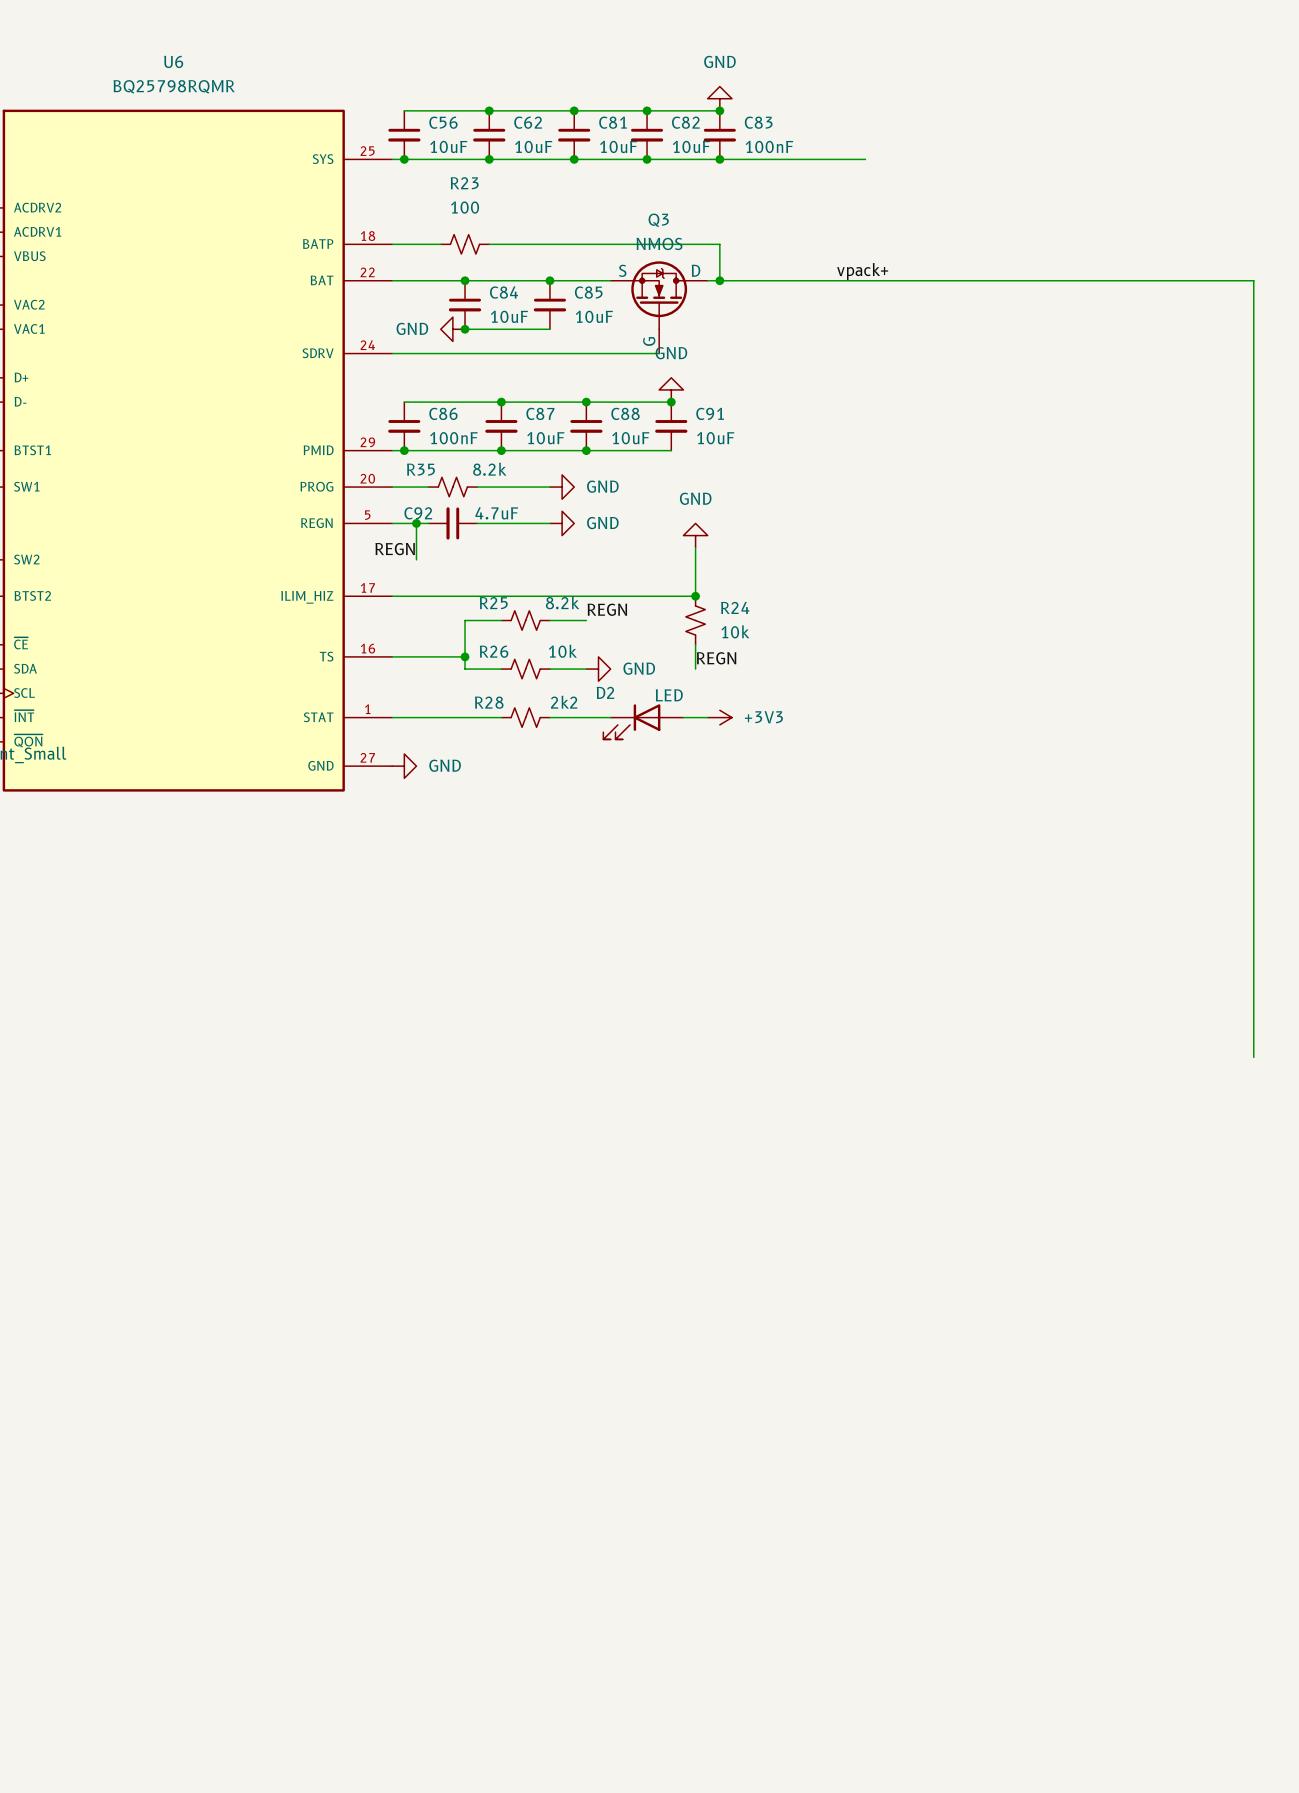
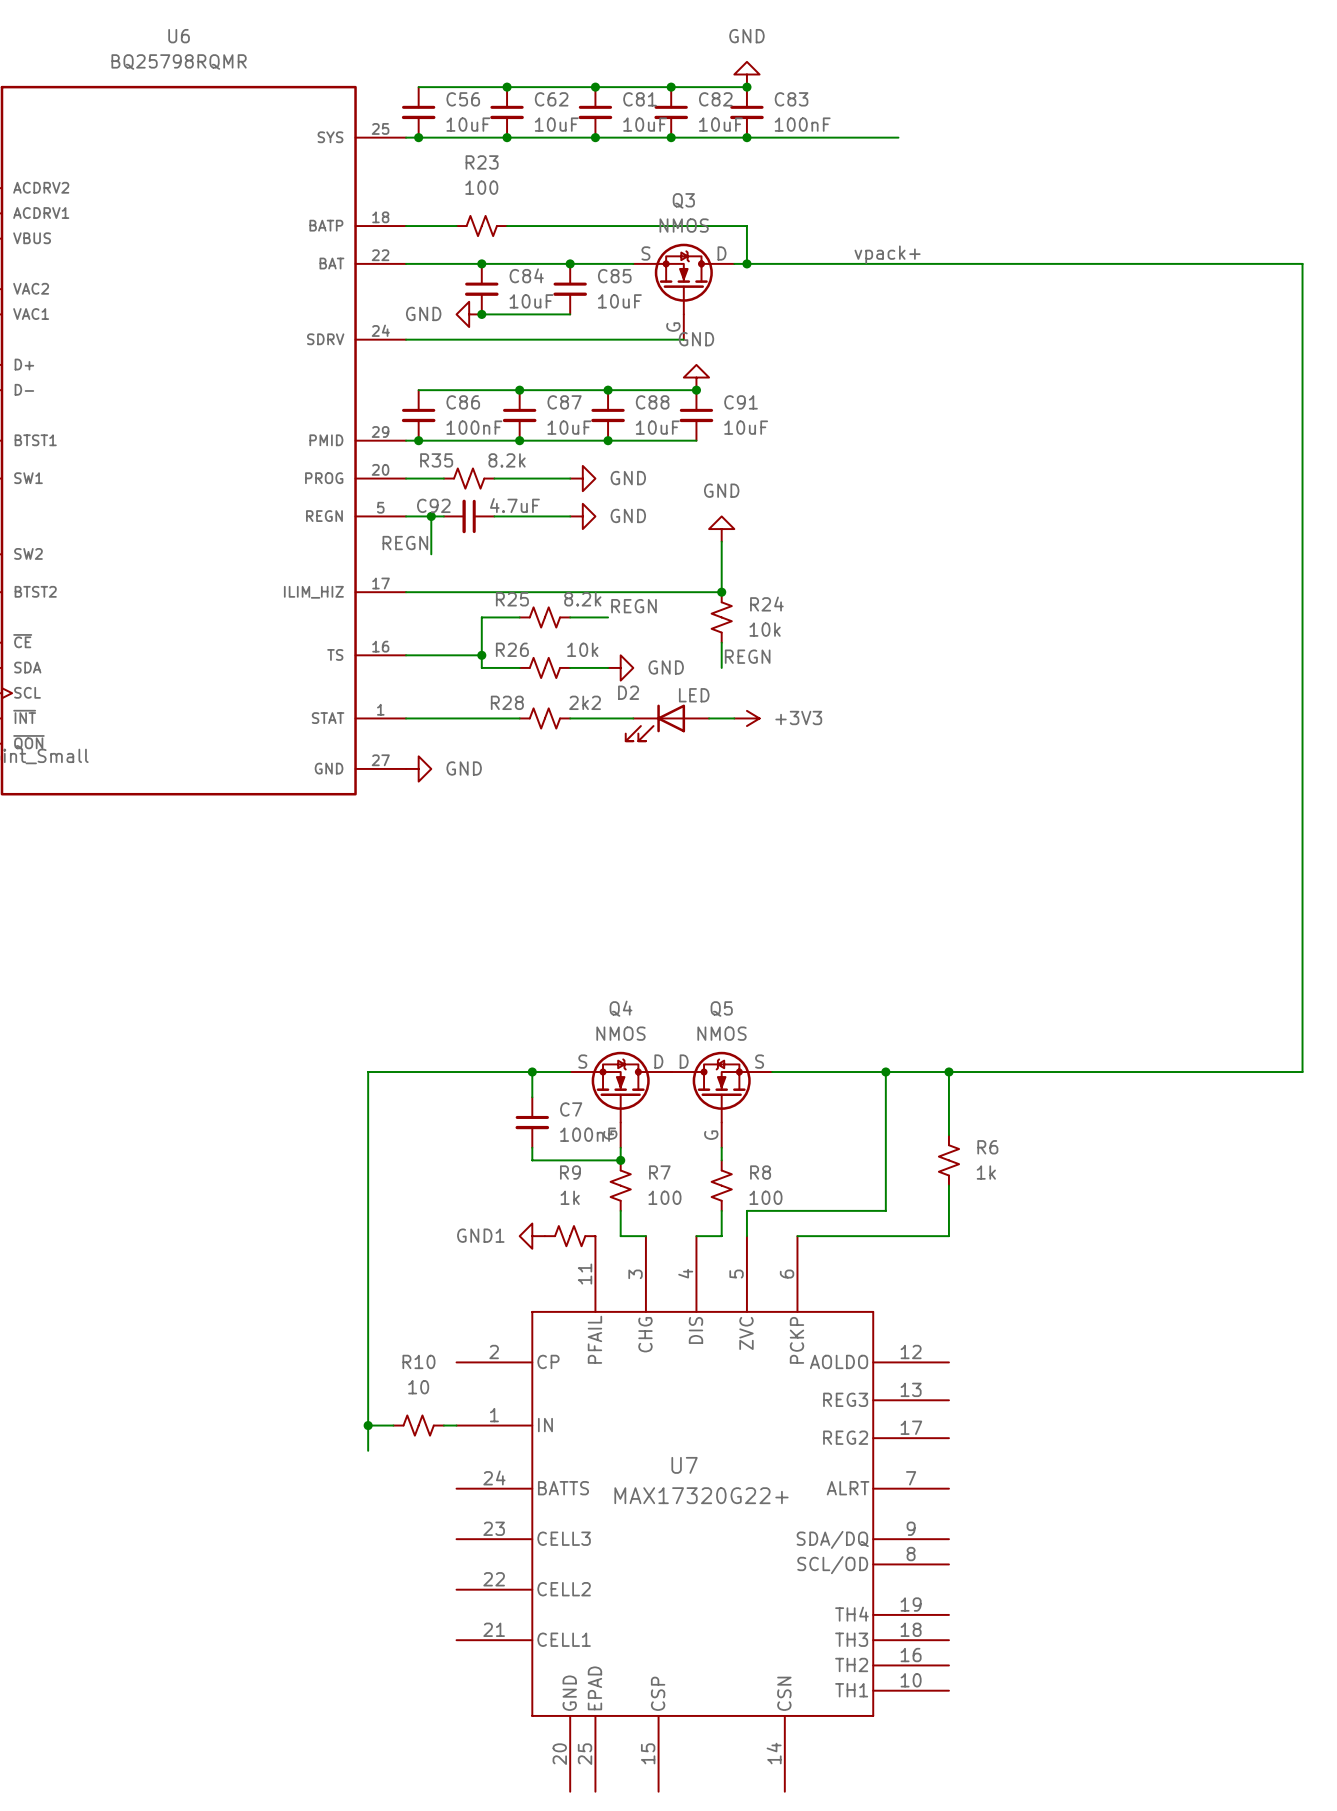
wire: none -> (532, 1072) (532, 1097)
junction: none -> (532, 1072)
wire: none -> (570, 1072) (368, 1072) (368, 1450)
wire: none -> (772, 1072) (1302, 1072)
wire: none -> (885, 1072) (885, 1210) (746, 1210) (746, 1236)
junction: none -> (885, 1072)
wire: none -> (948, 1072) (948, 1135)
junction: none -> (948, 1072)
Q4: none -> NMOS (620, 1099)
Q5: none -> NMOS (721, 1099)
C7: none -> 100nF (532, 1122)
wire: none -> (532, 1147) (532, 1160) (620, 1160) (620, 1147)
wire: none -> (721, 1147) (721, 1160)
junction: none -> (620, 1160)
R6: none -> 1k (948, 1160)
R7: none -> 100 (620, 1185)
R8: none -> 100 (721, 1185)
wire: none -> (948, 1185) (948, 1236) (797, 1236)
wire: none -> (620, 1210) (620, 1236) (645, 1236)
wire: none -> (721, 1210) (721, 1236) (696, 1236)
power symbol: none -> GND1 (532, 1236)
R9: none -> 1k (570, 1236)
wire: none -> (368, 1425) (393, 1425)
junction: none -> (368, 1425)
R10: none -> 10 (418, 1425)
wire: none -> (443, 1425) (456, 1425)
U7: none -> MAX17320G22+ (702, 1513)

